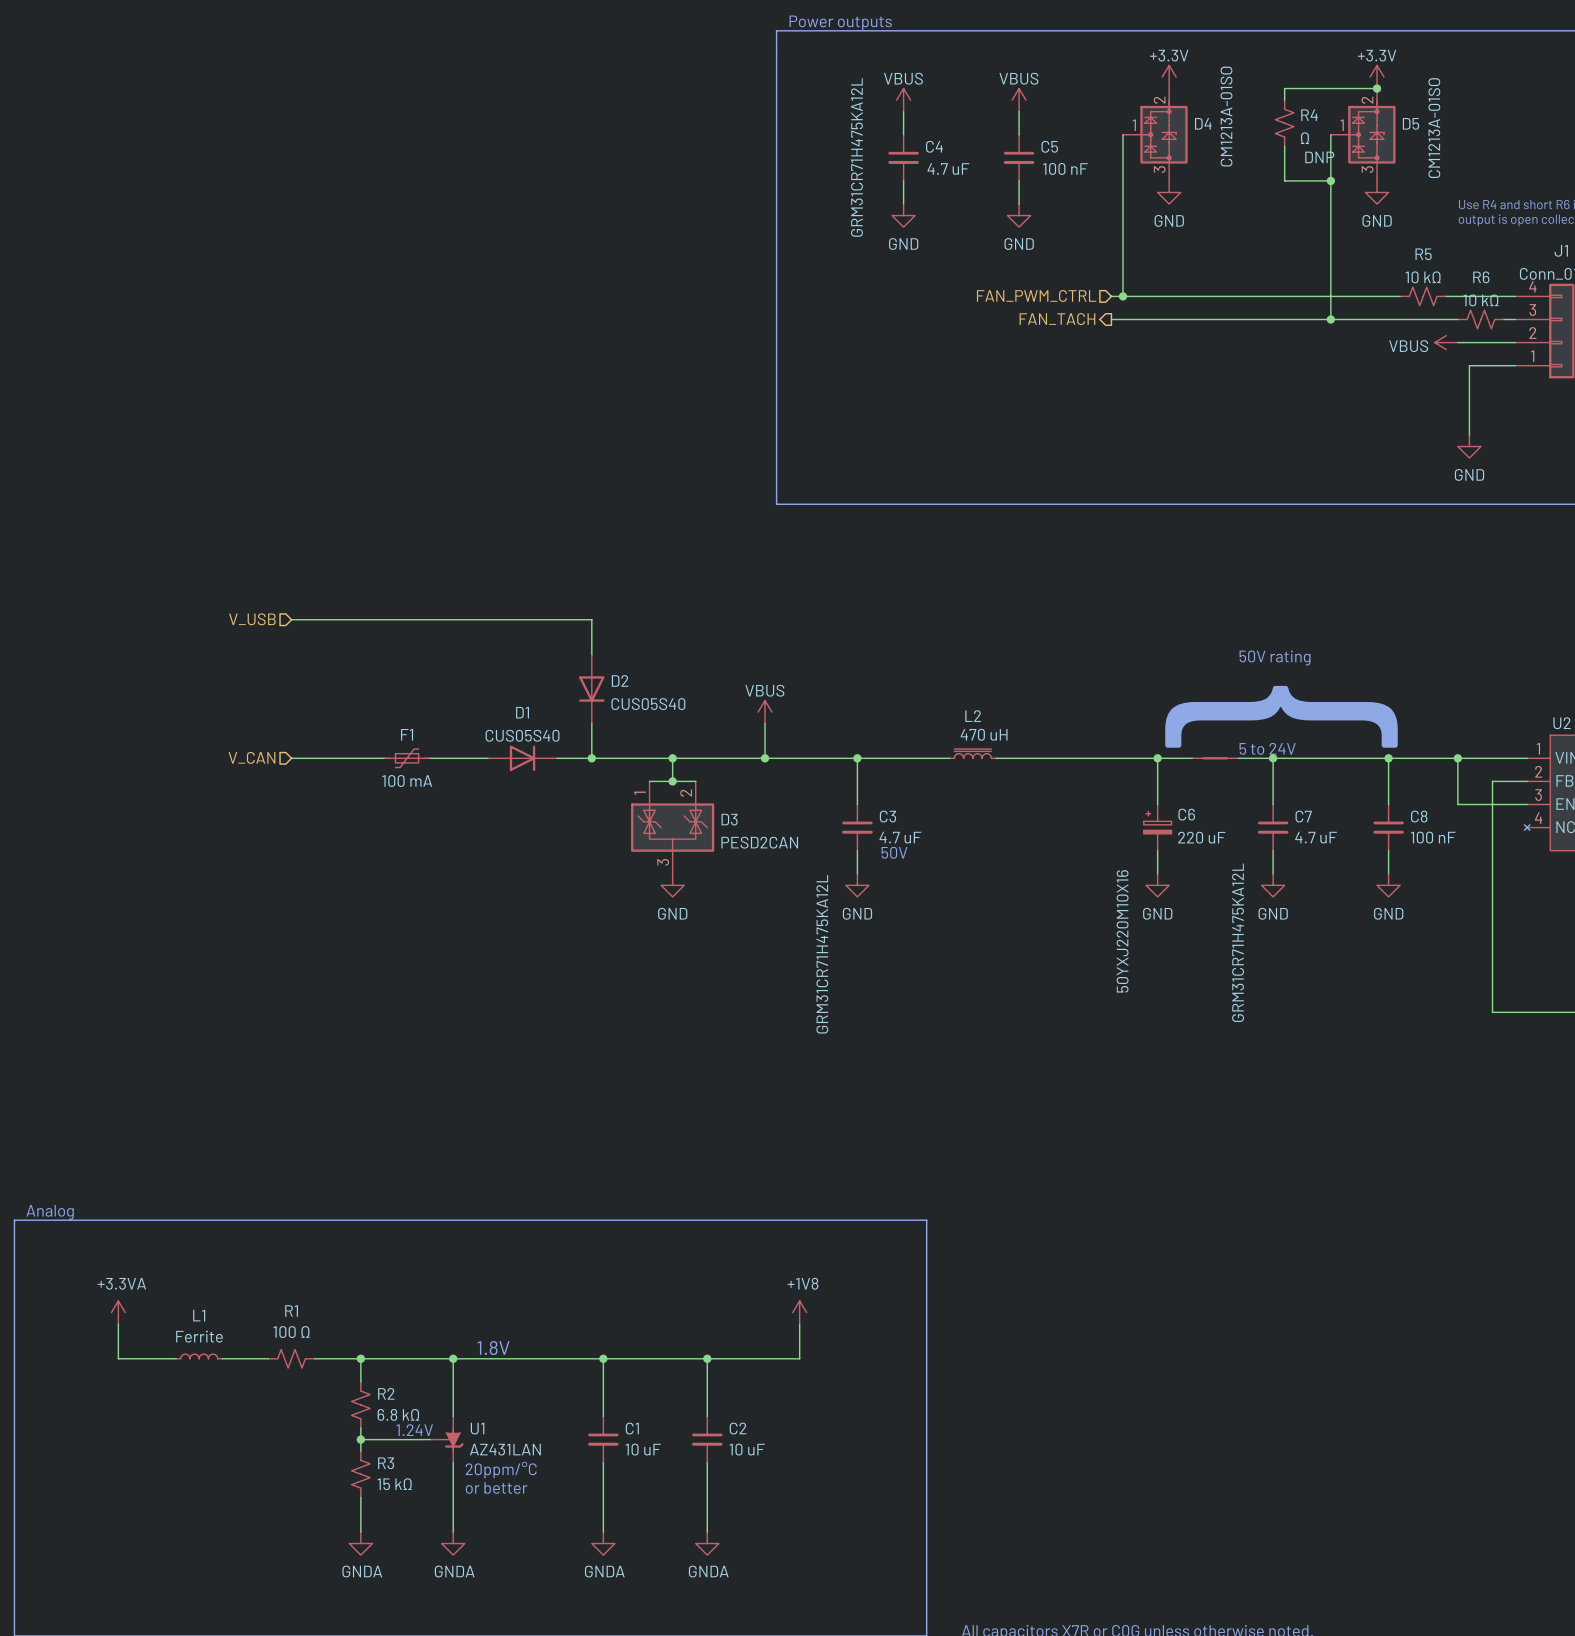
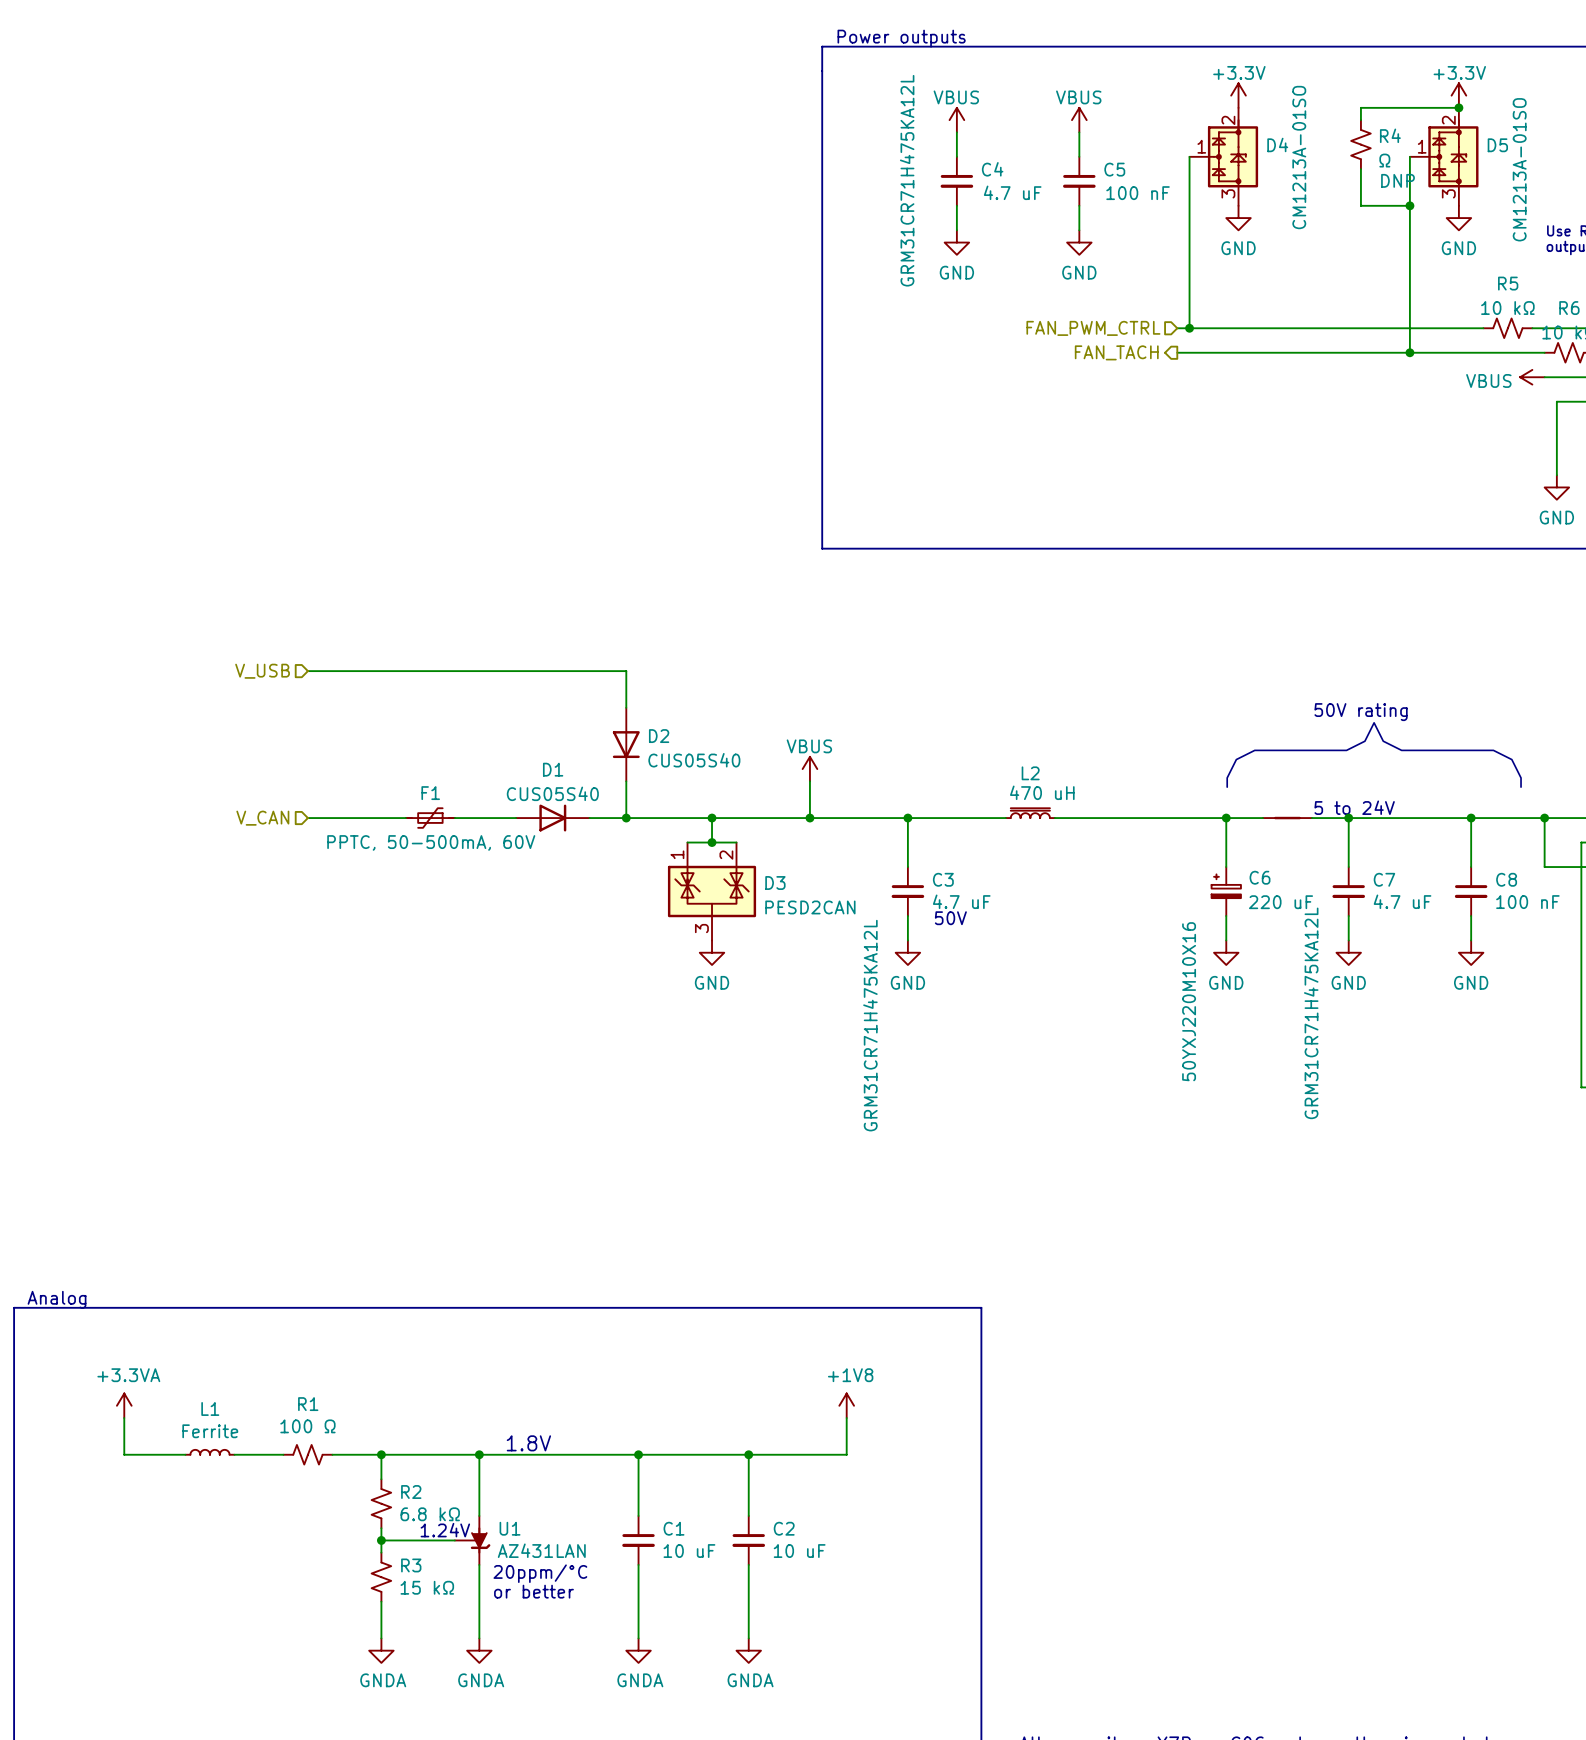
F1 value: 100 mA (407, 780) -> PPTC, 50-500mA, 60V (431, 842)

